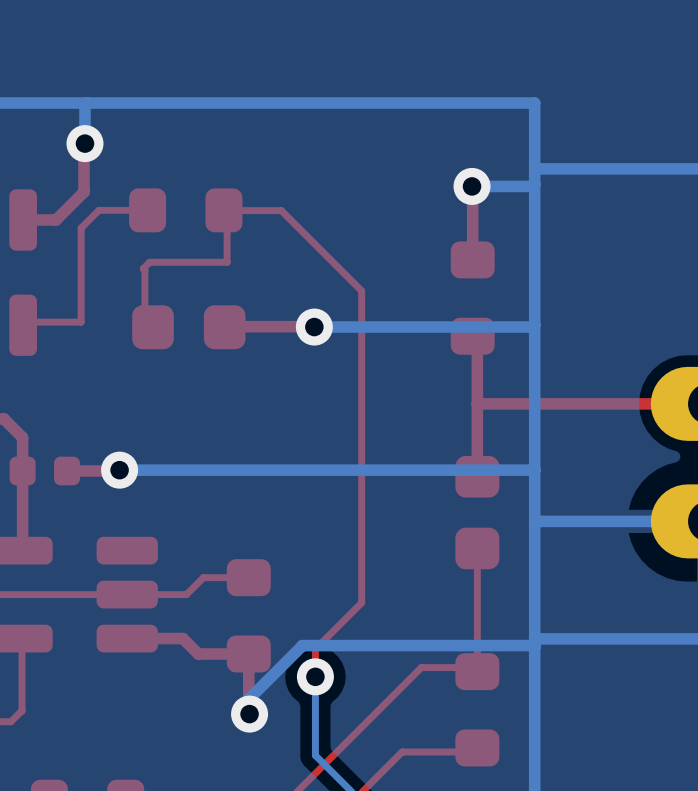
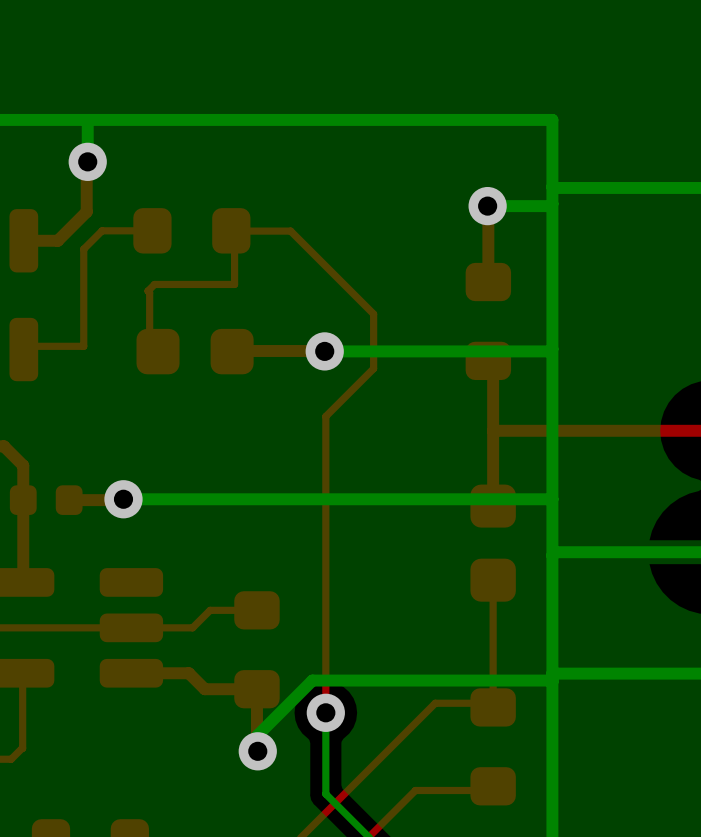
top track: (361, 343) (361, 602) (315, 649) -> (373, 368) (325, 416) (325, 684)

